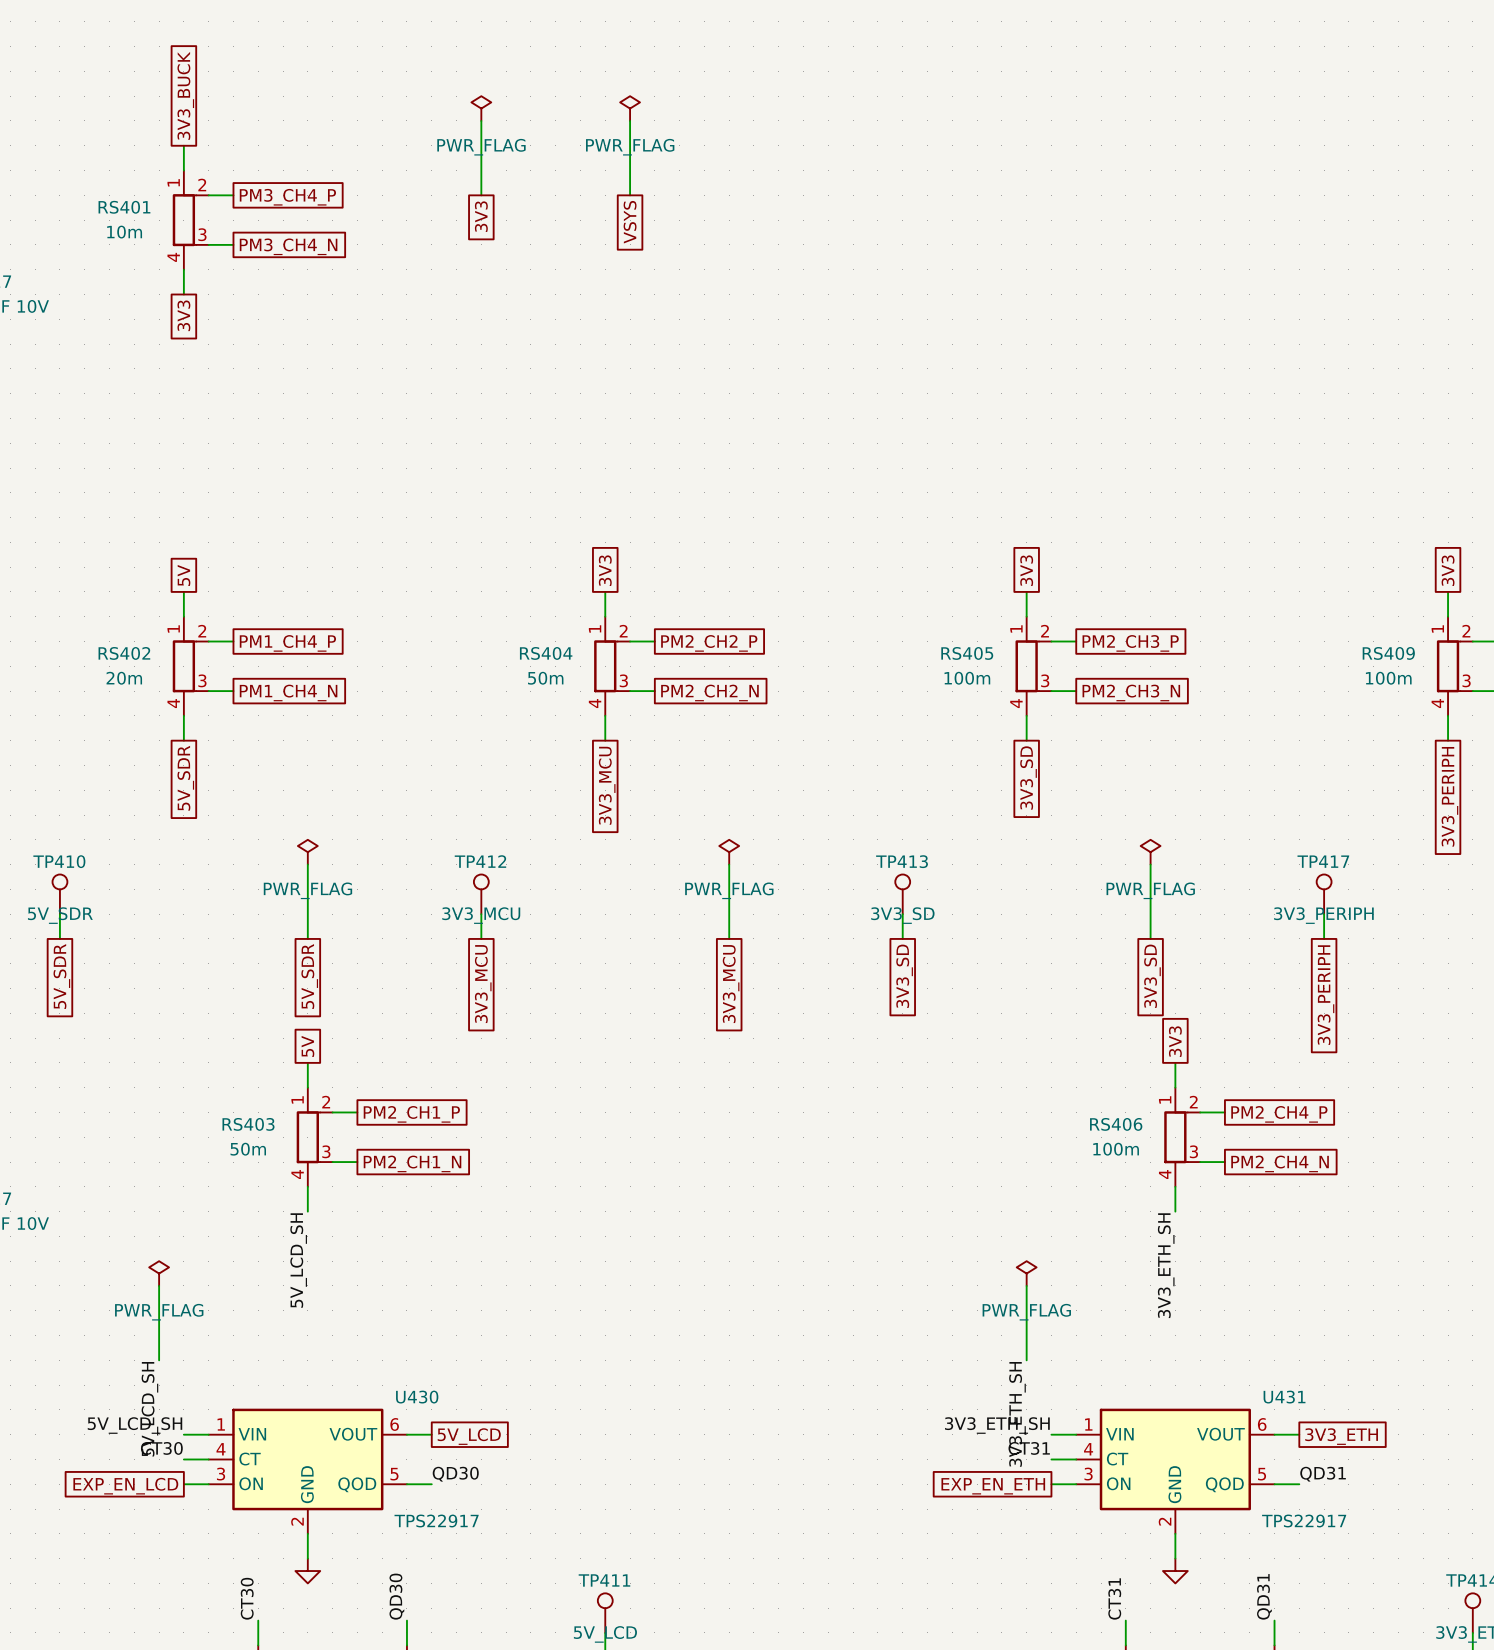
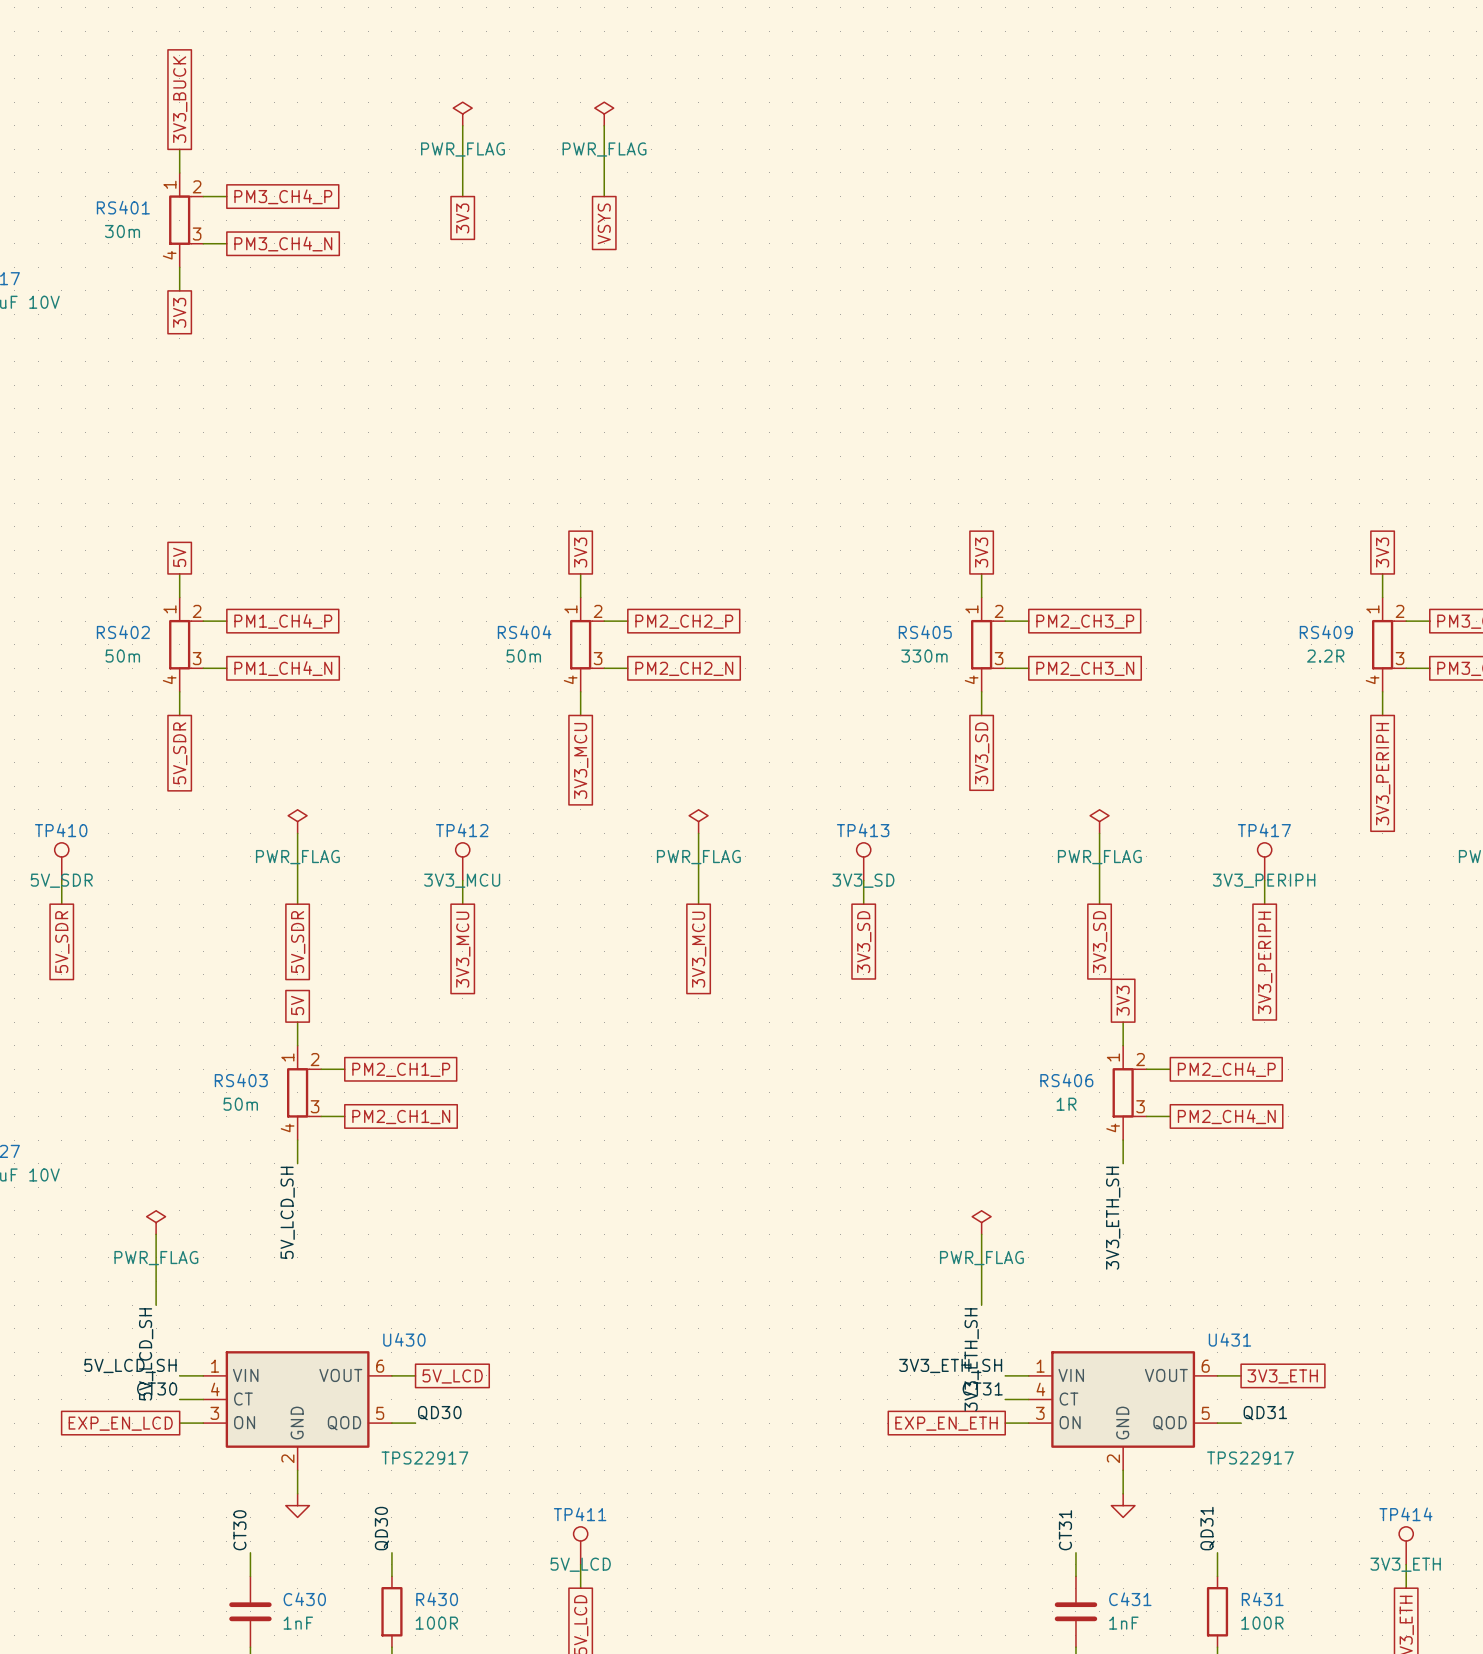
RS401 value: 10m (124, 232) -> 30m (122, 231)
RS402 value: 20m (124, 678) -> 50m (122, 656)
RS405 value: 100m (967, 678) -> 330m (924, 656)
RS409 value: 100m (1388, 678) -> 2.2R (1325, 656)
RS406 value: 100m (1116, 1149) -> 1R (1066, 1104)

